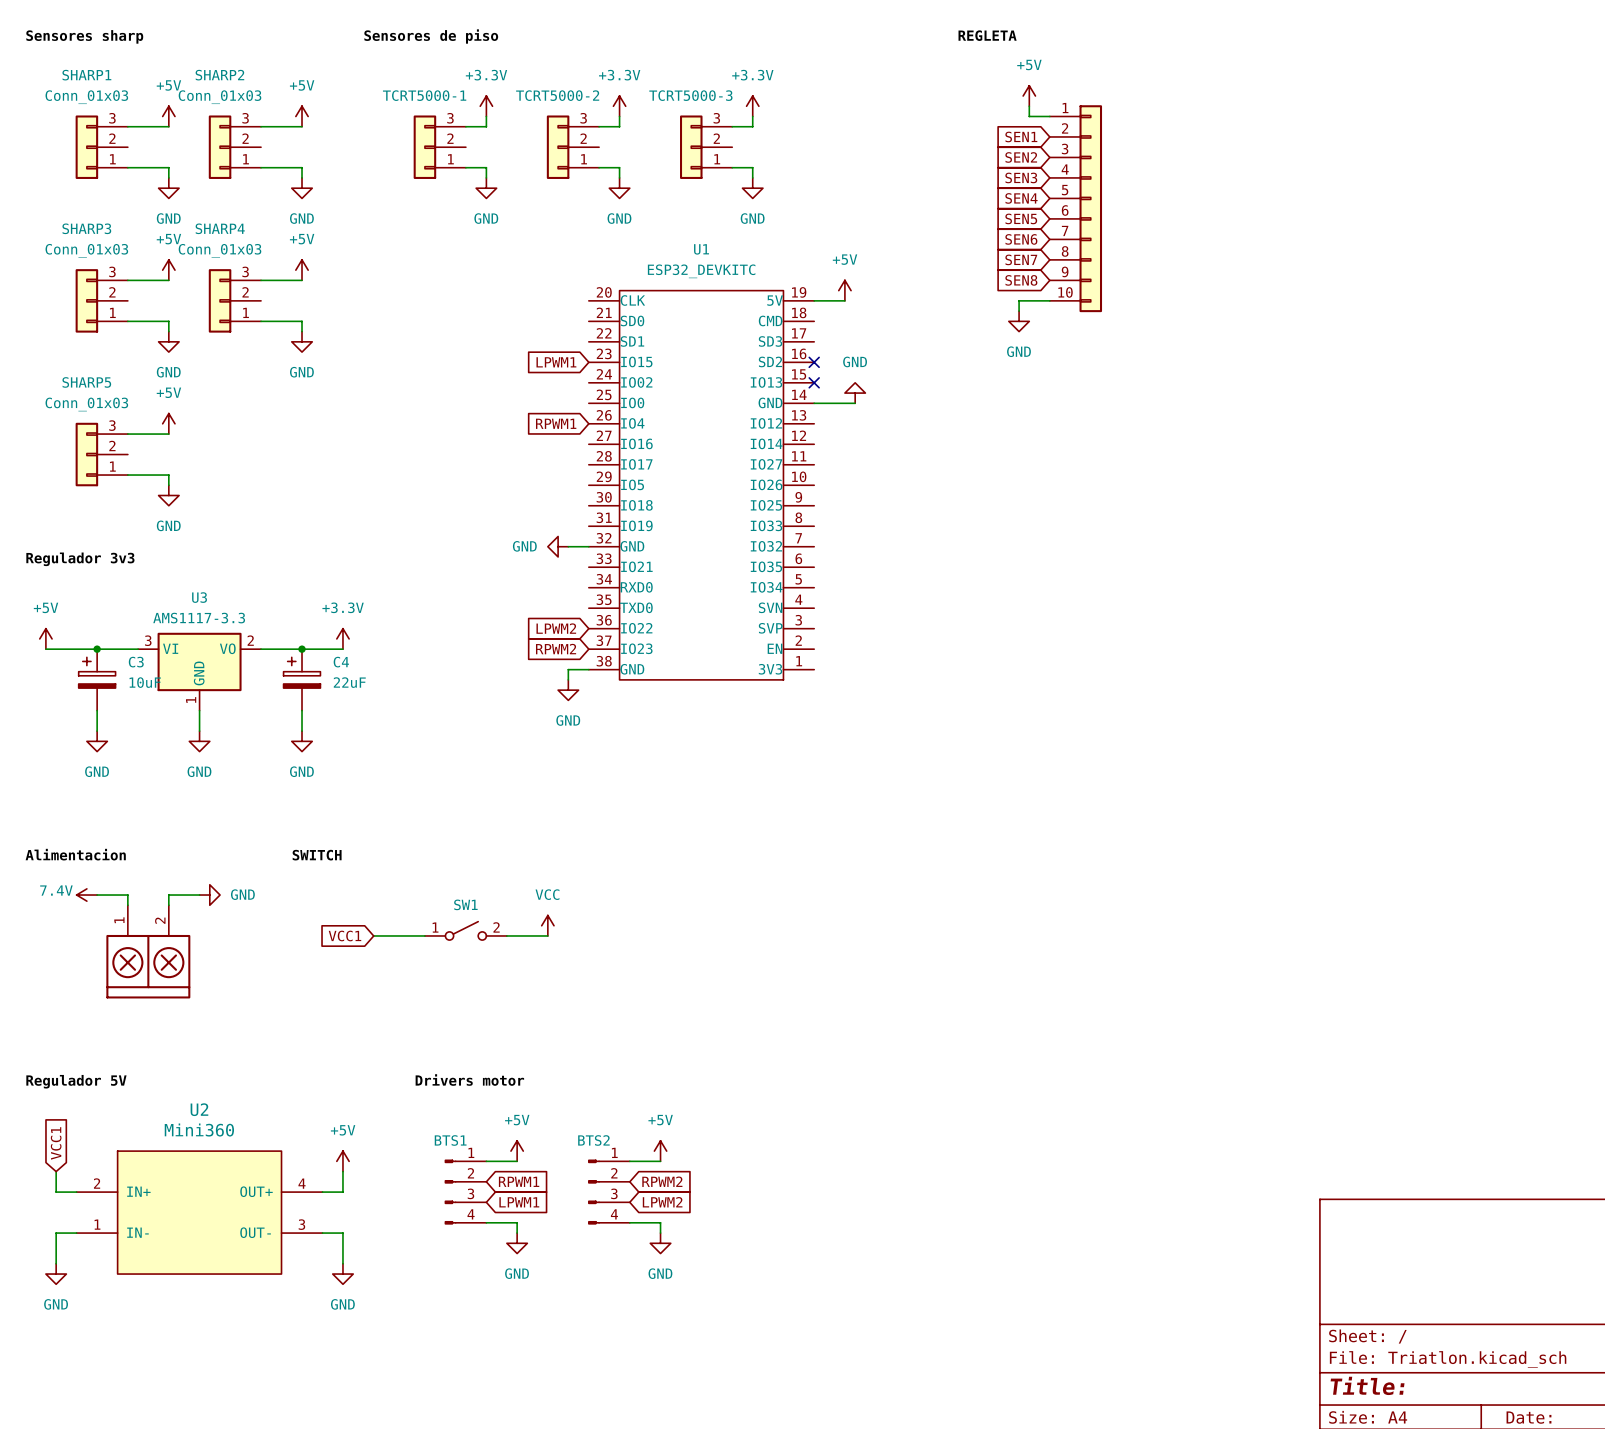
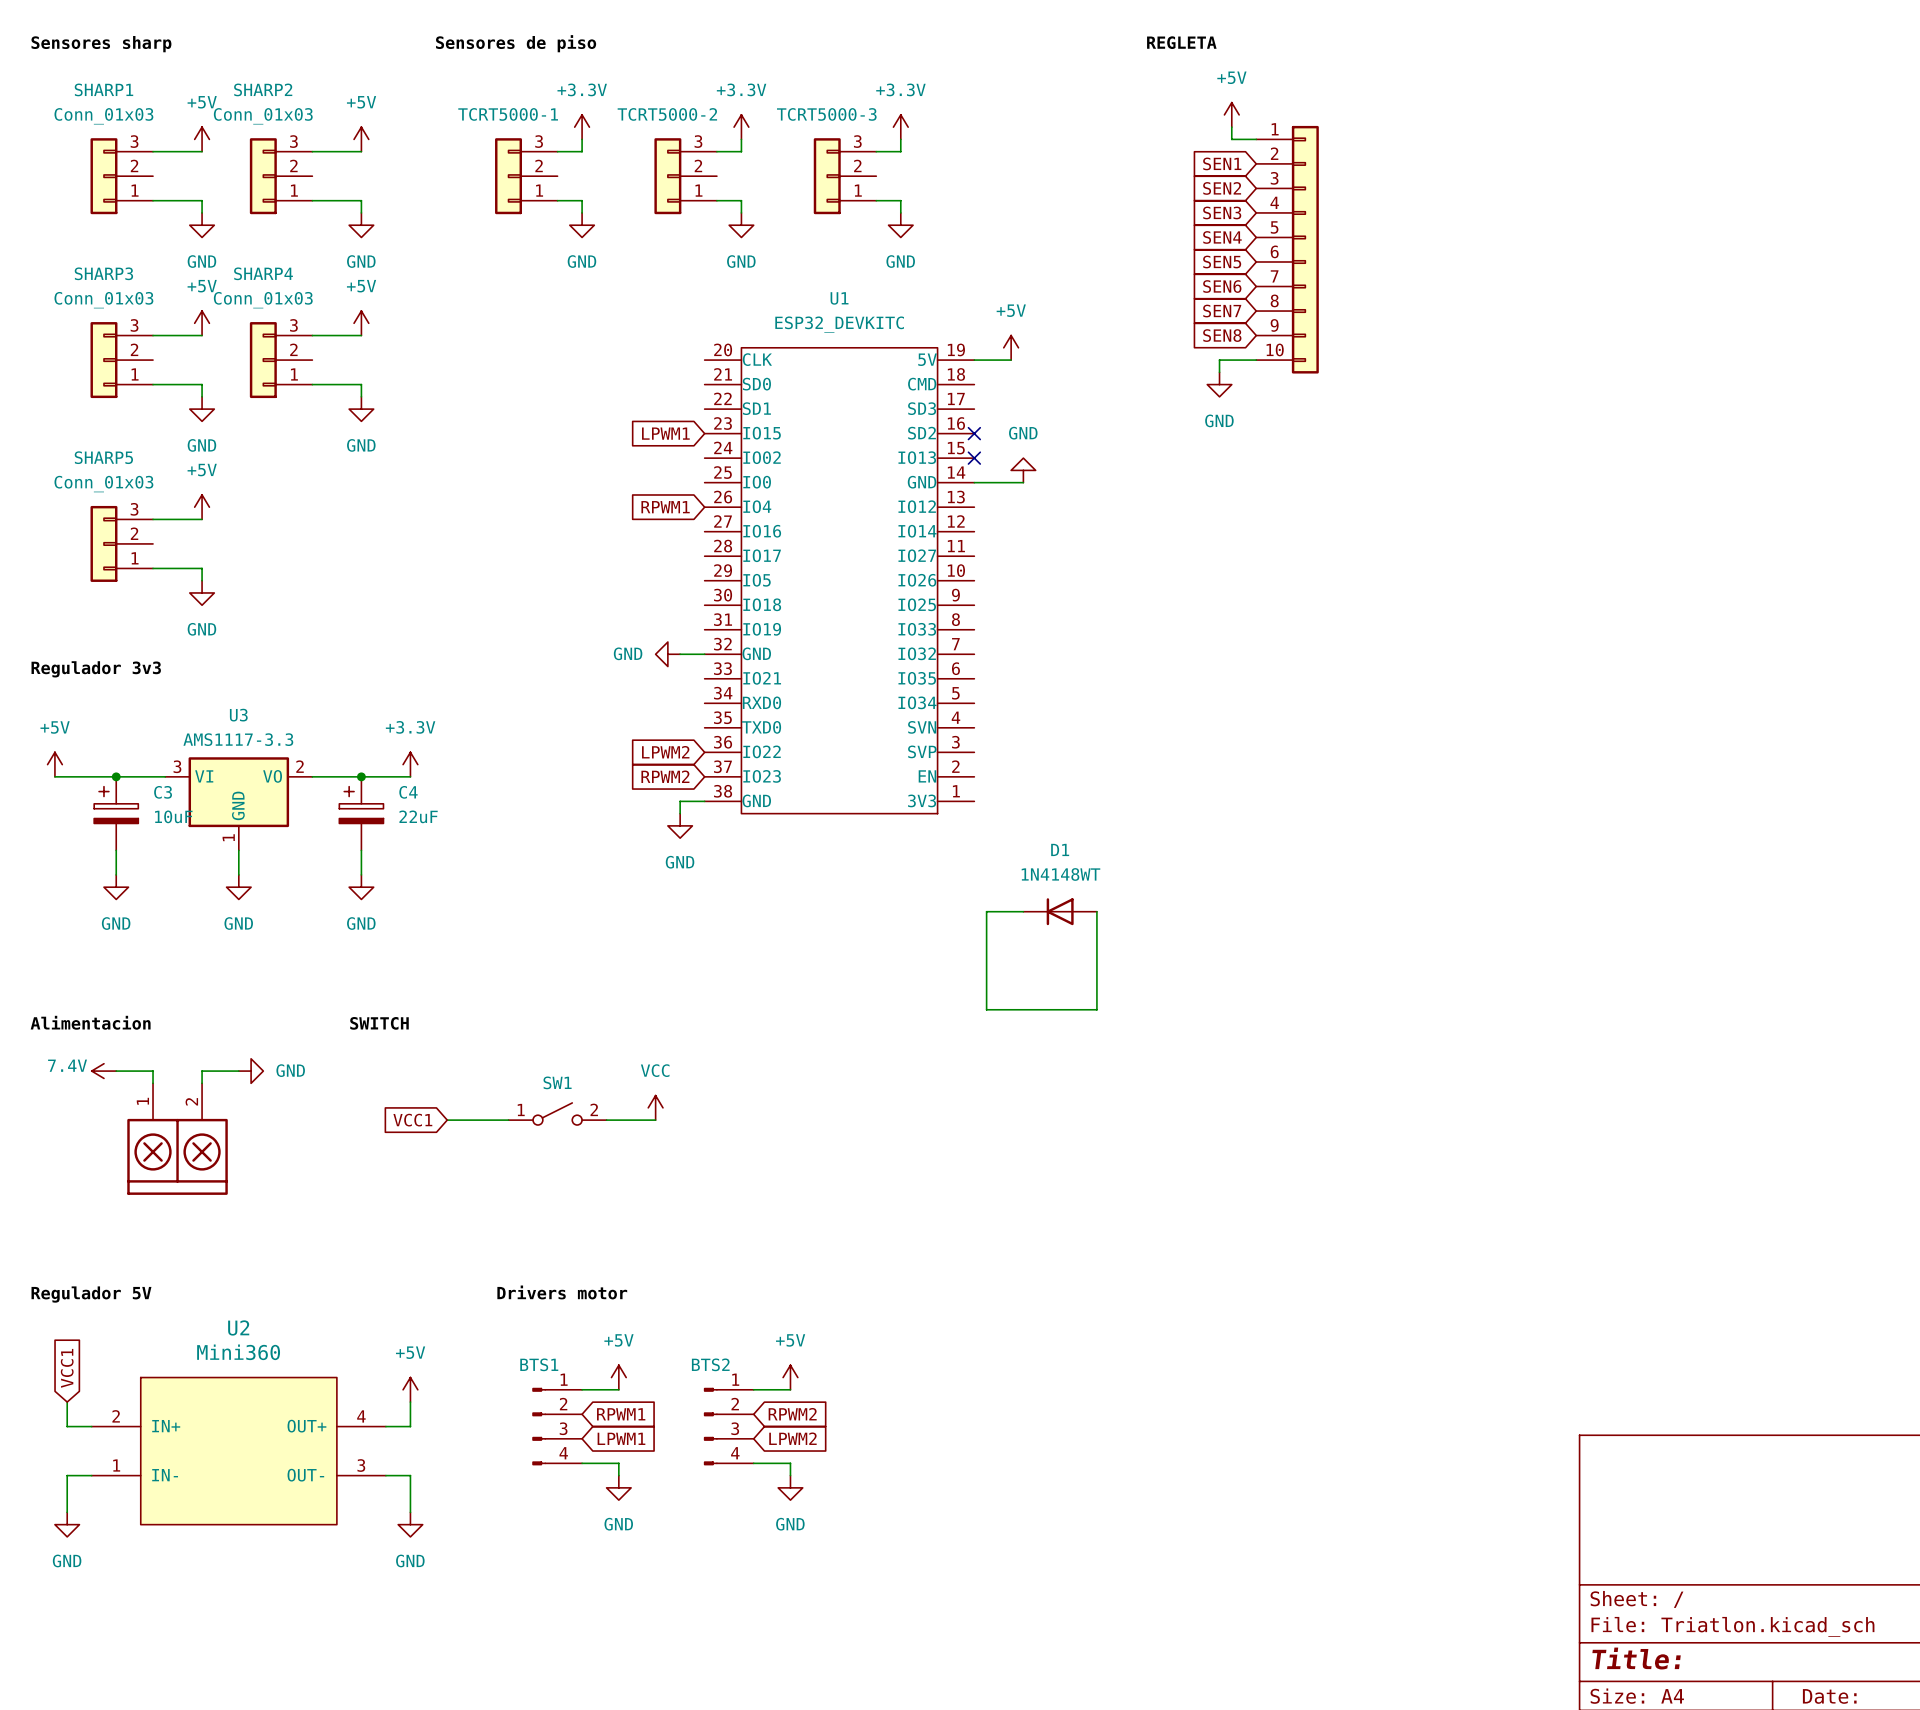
wire: none -> (1023, 911) (986, 911) (986, 1009) (1096, 1009) (1096, 911)
D1: none -> 1N4148WT (1060, 911)

